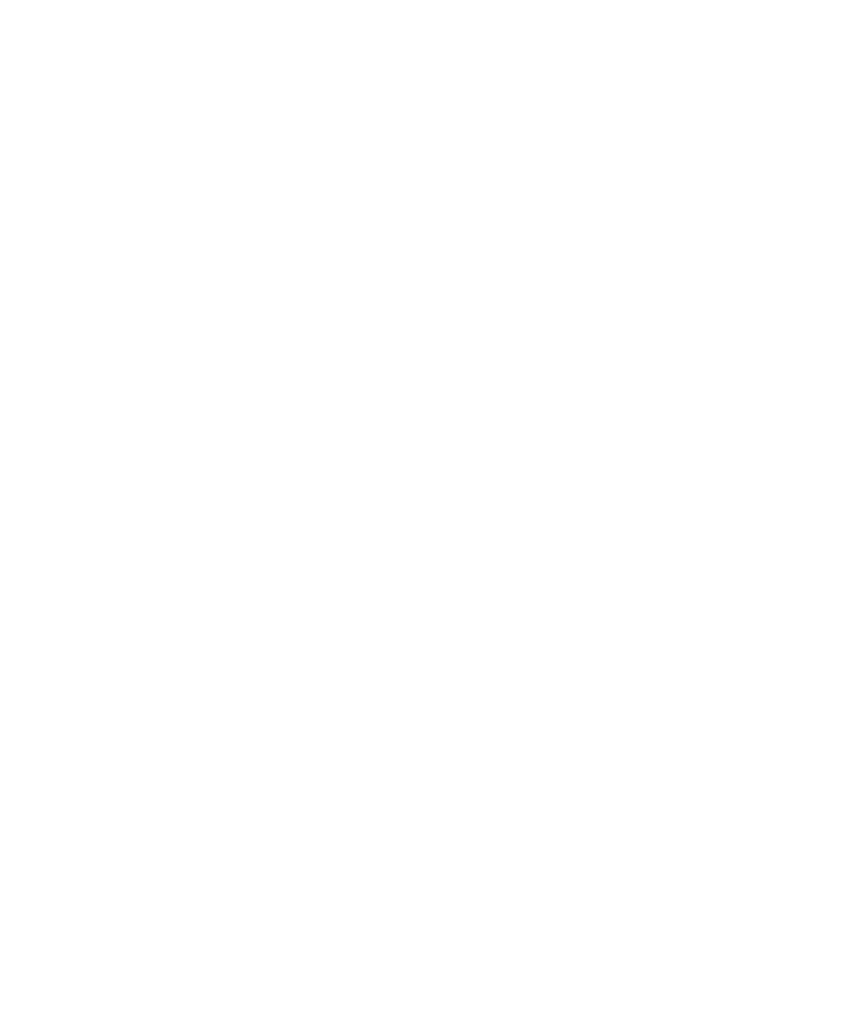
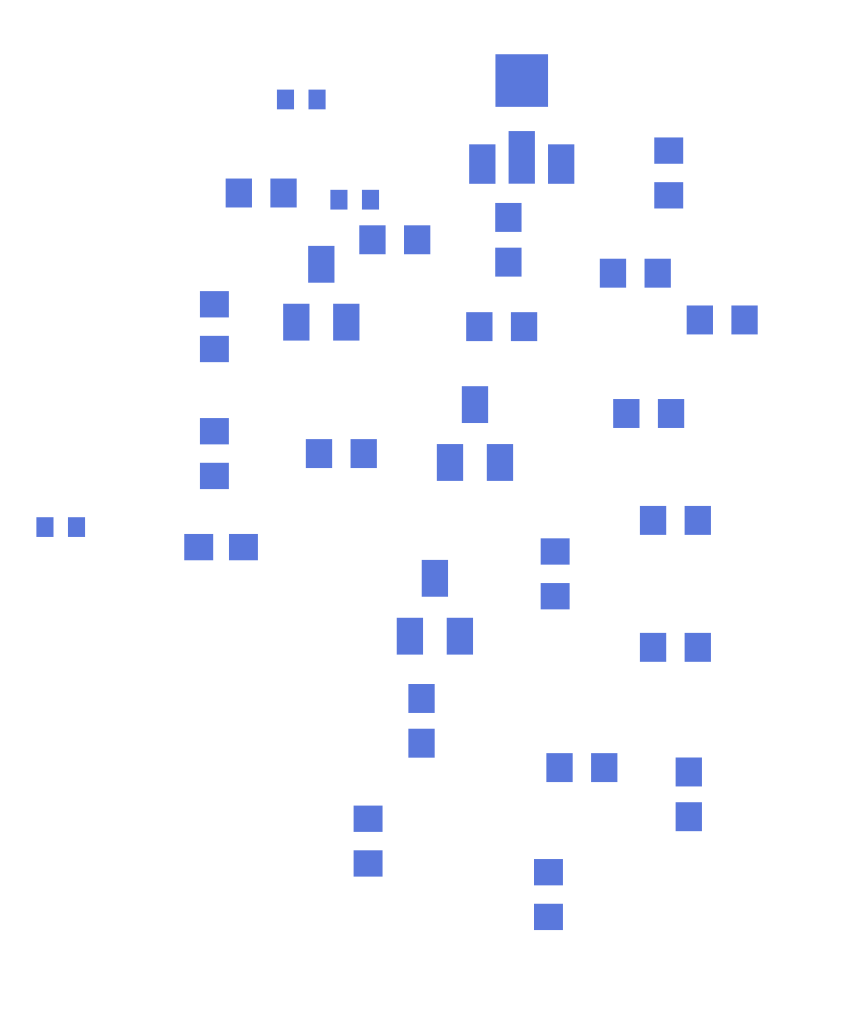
part: none -> (301, 99)
part: none -> (521, 119)
part: none -> (668, 172)
part: none -> (261, 193)
part: none -> (354, 199)
part: none -> (394, 239)
part: none -> (508, 239)
part: none -> (635, 273)
part: none -> (321, 293)
part: none -> (722, 319)
part: none -> (214, 326)
part: none -> (501, 326)
part: none -> (648, 413)
part: none -> (474, 433)
part: none -> (214, 453)
part: none -> (341, 453)
part: none -> (675, 520)
part: none -> (60, 527)
part: none -> (221, 547)
part: none -> (555, 573)
part: none -> (434, 607)
part: none -> (675, 647)
part: none -> (421, 720)
part: none -> (581, 767)
part: none -> (688, 794)
part: none -> (368, 841)
part: none -> (548, 894)

